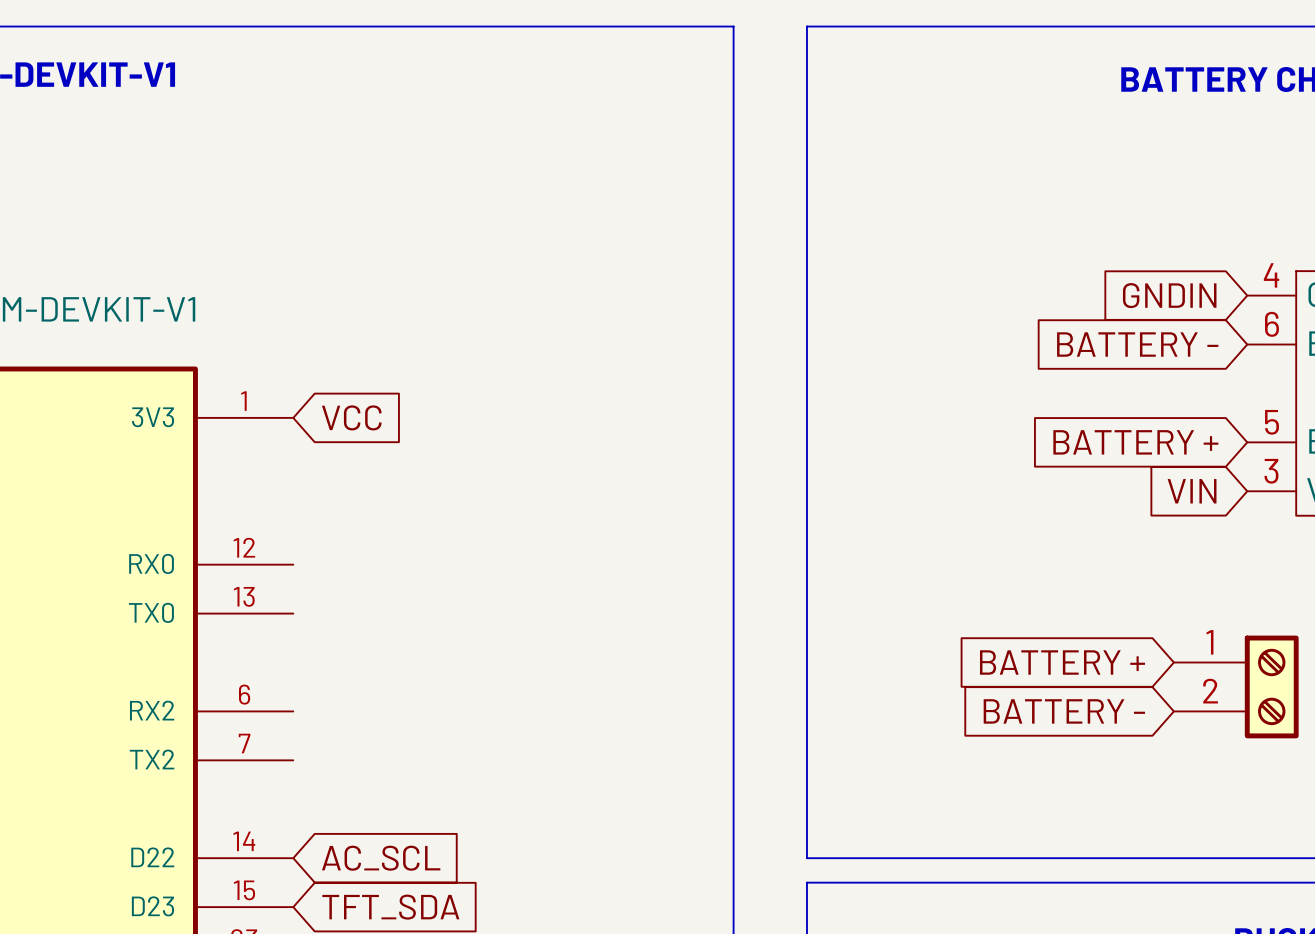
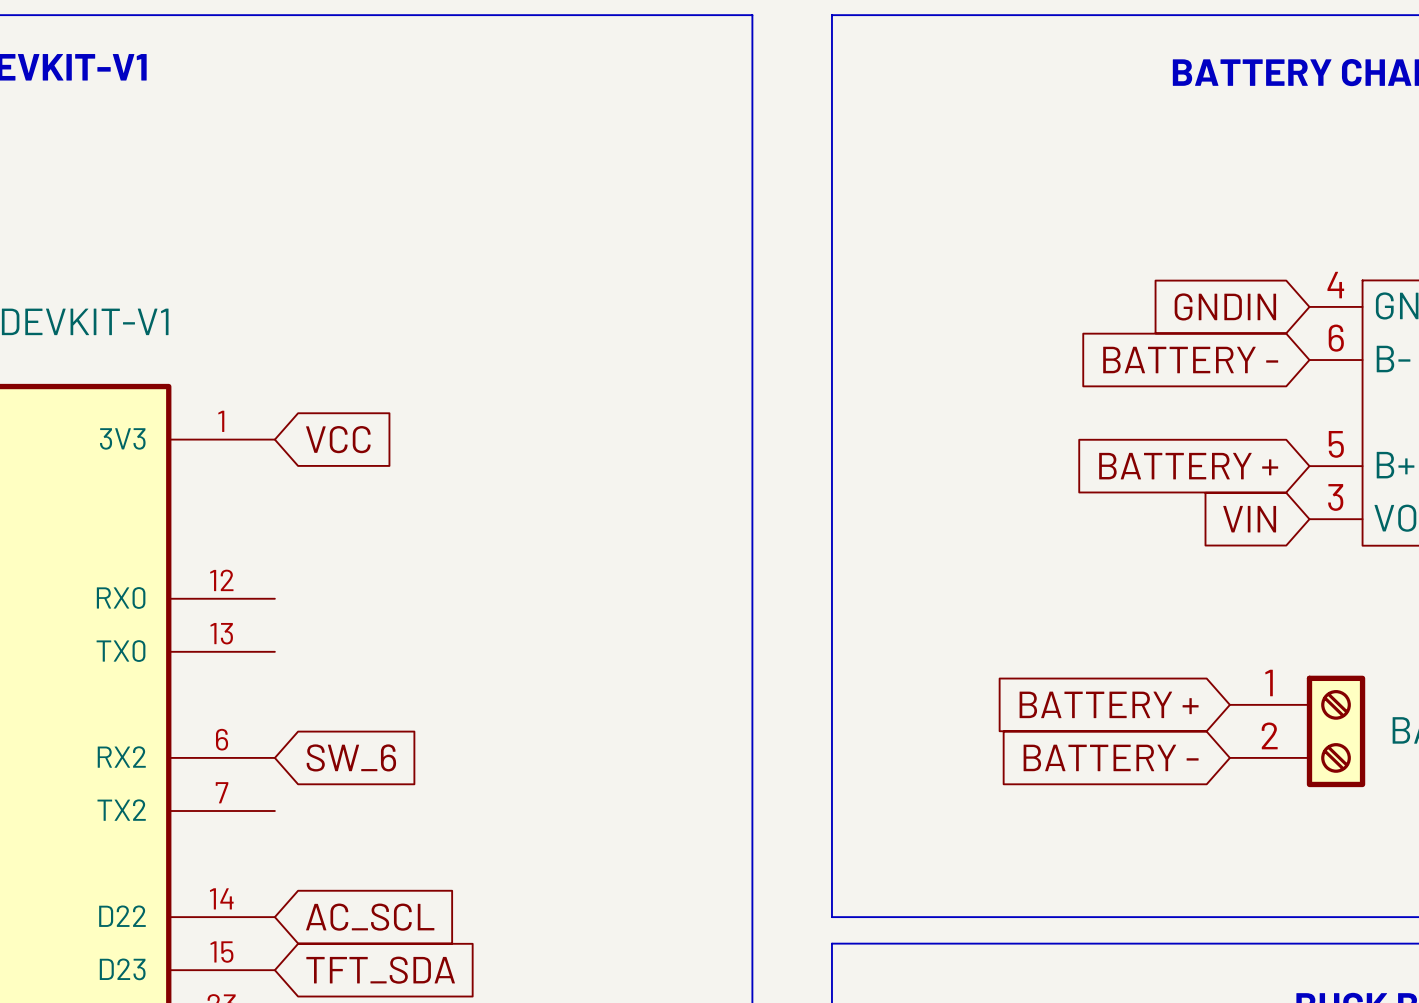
global label: none -> SW_6 (351, 757)

